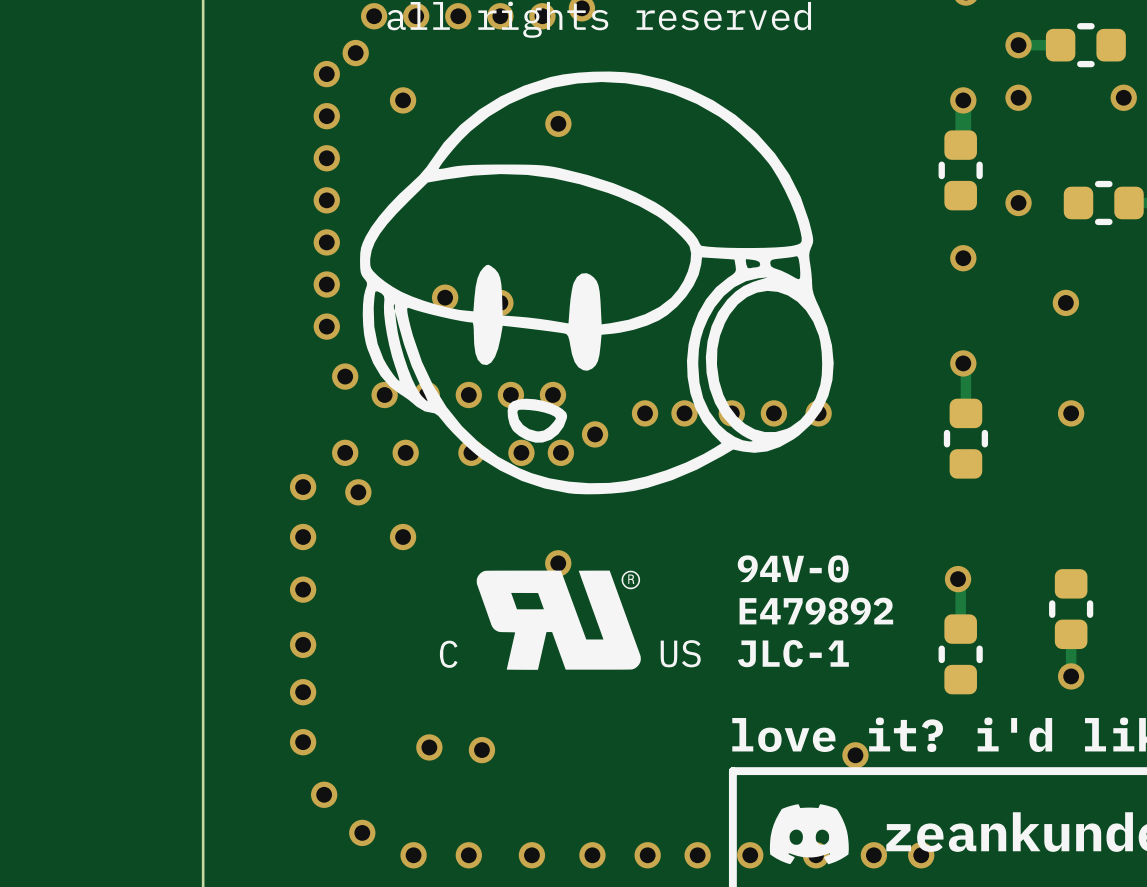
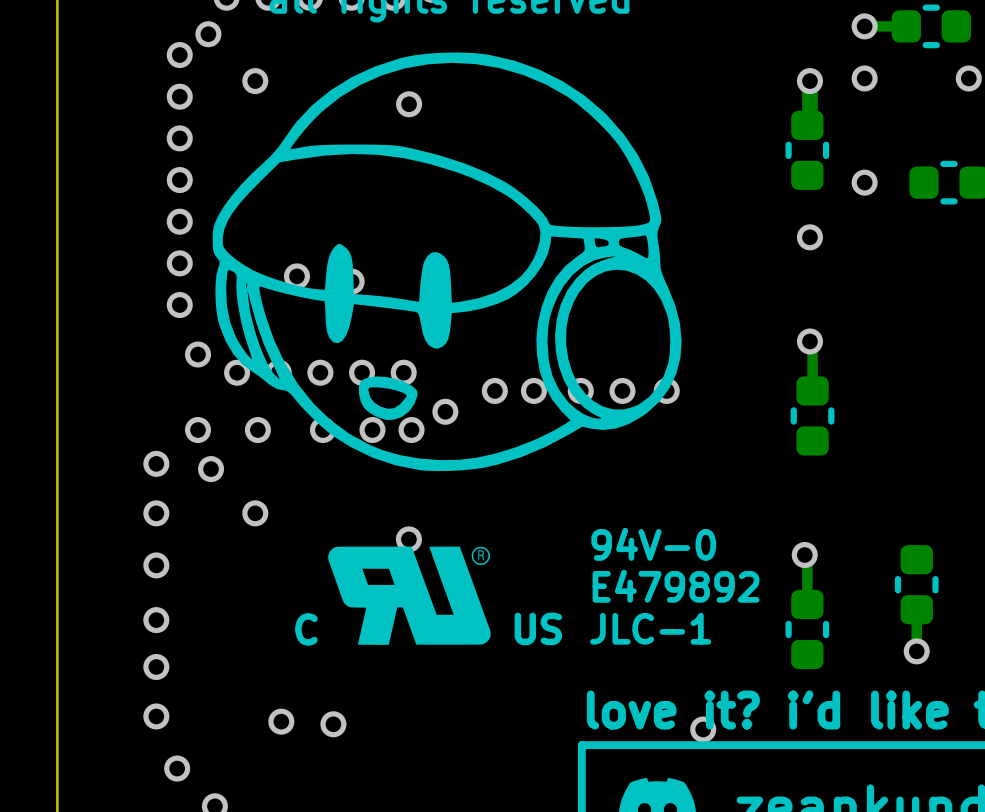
via: (1065, 302) -> none
via: (1071, 413) -> none

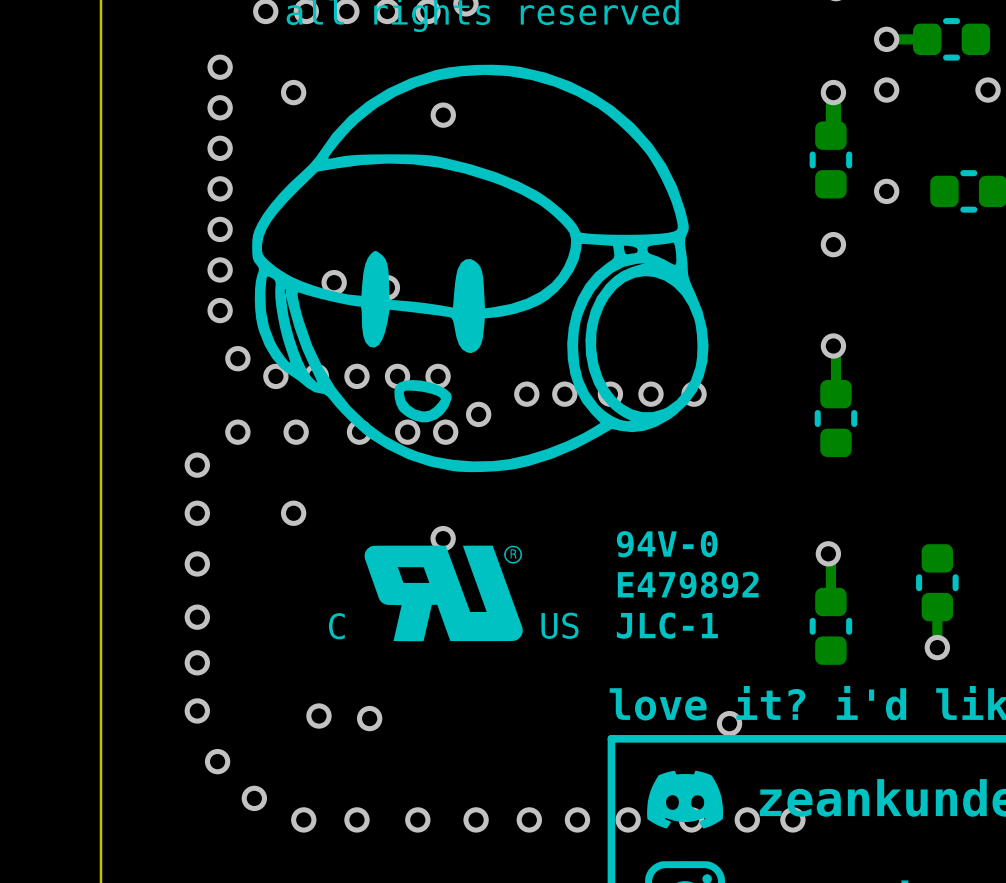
via: (208, 34) -> none
via: (211, 469) -> none

